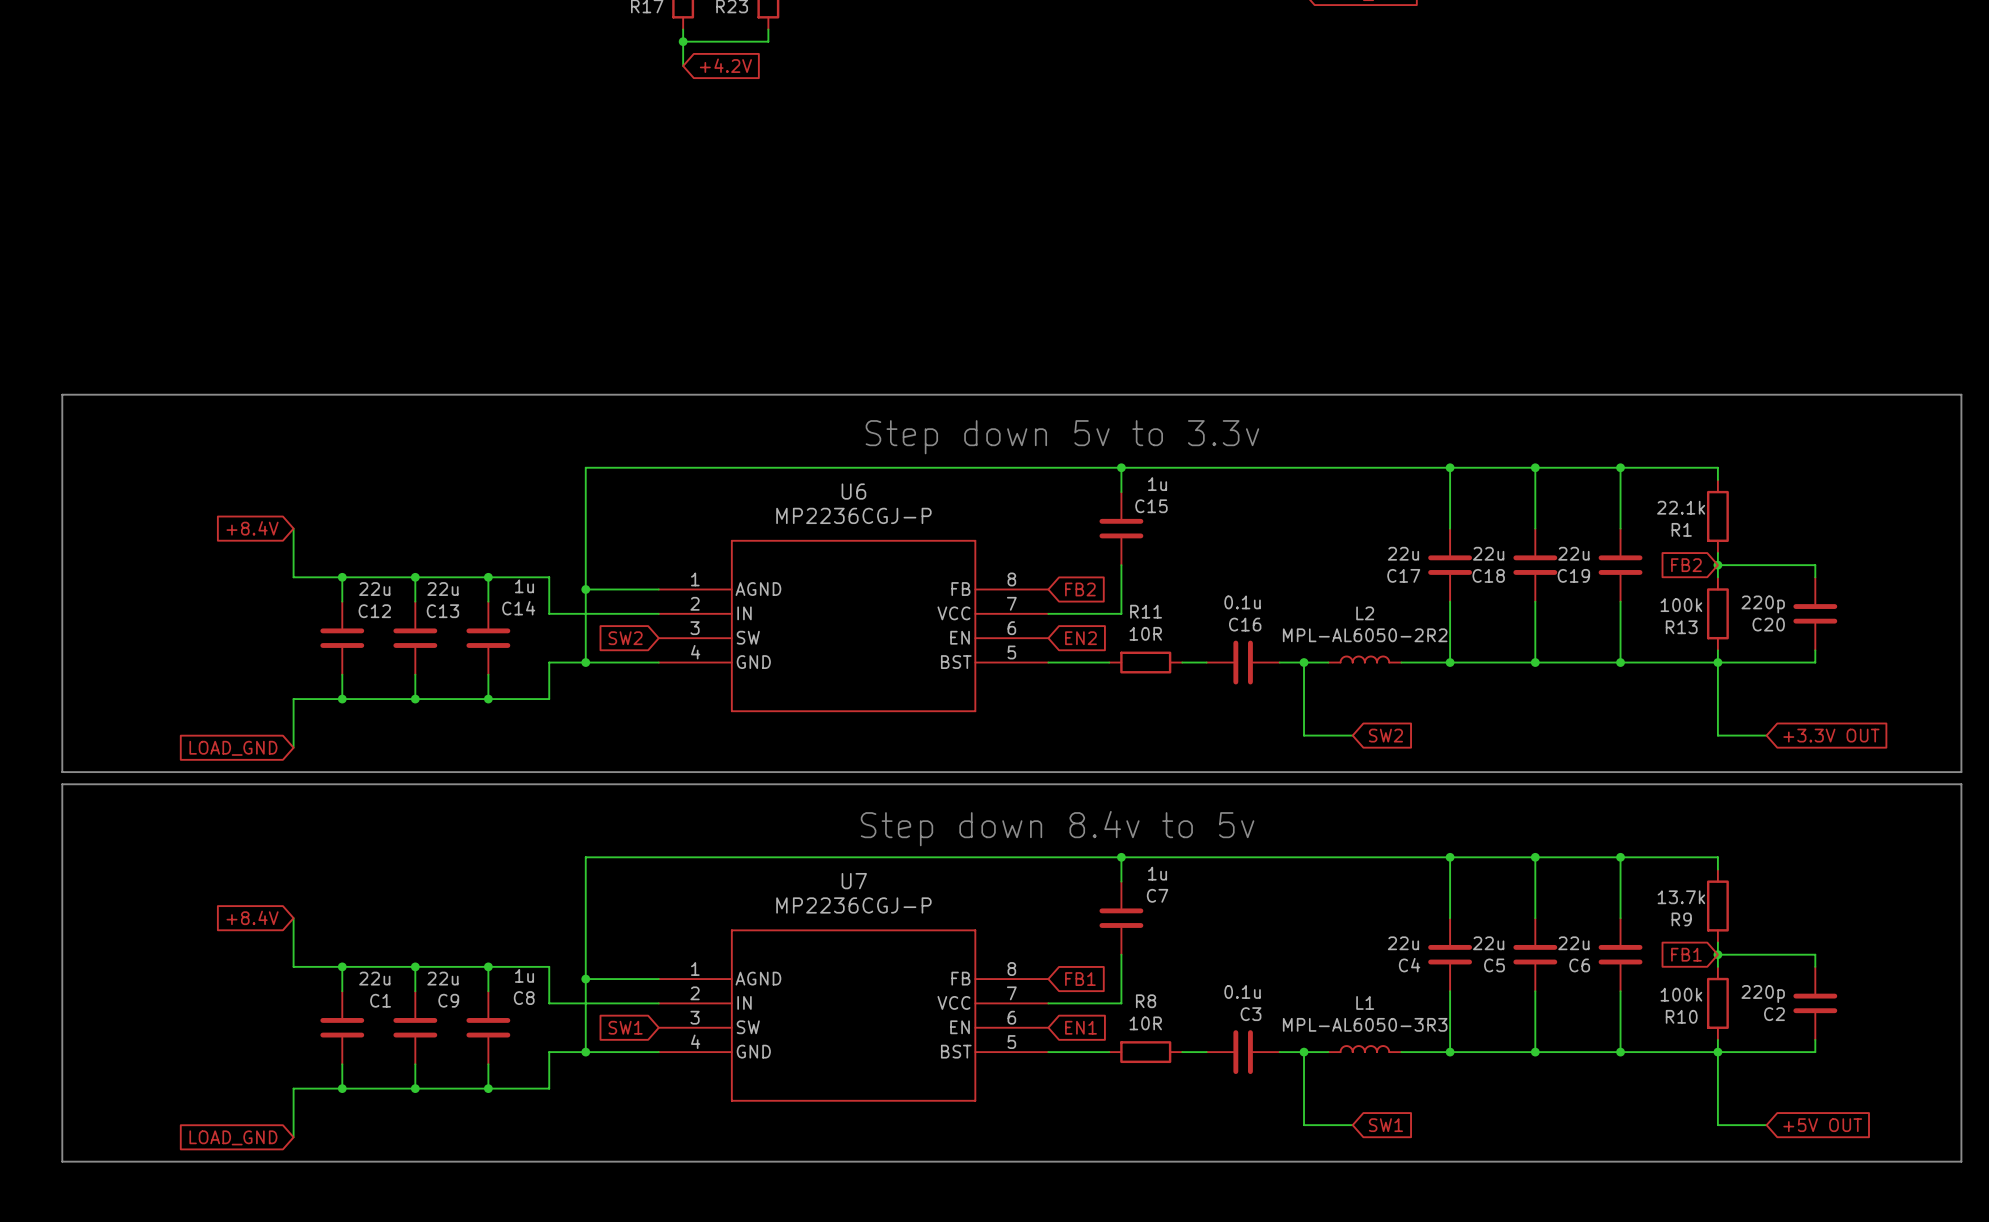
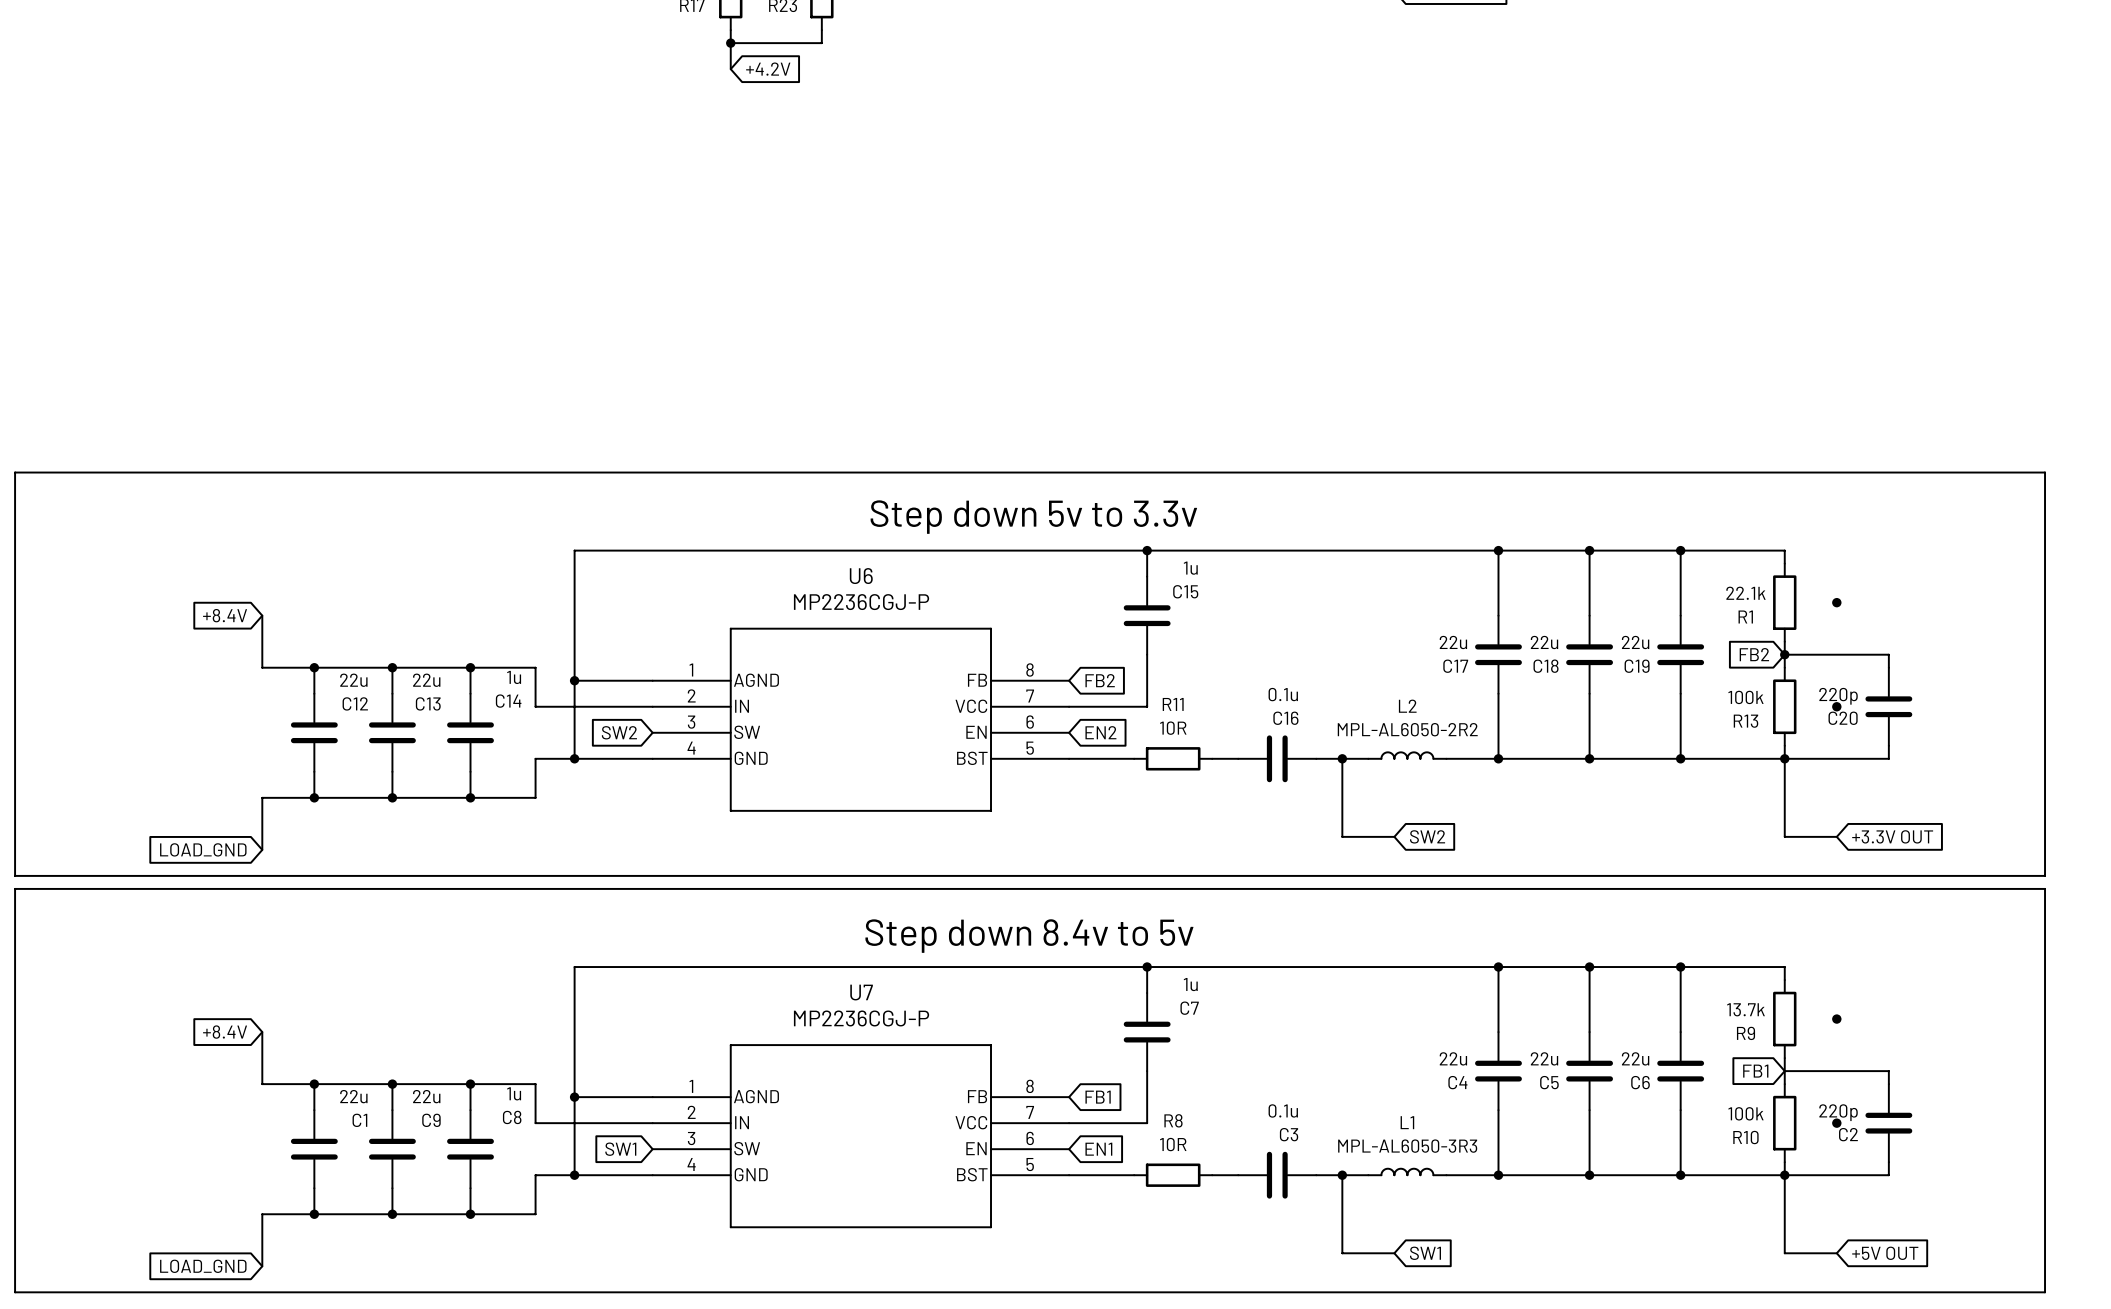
line: (62, 394) (1961, 394) (1961, 772) (62, 772) (62, 394) -> (15, 472) (2045, 472) (2045, 875) (15, 875) (15, 472)
text position: Step down 5v to 3.3v (1062, 437) -> Step down 5v to 3.3v (1033, 517)
wire: (1121, 467) (1121, 492) -> (1147, 550) (1147, 576)
junction: (1121, 467) -> none
wire: (1450, 467) (1450, 528) -> (1498, 550) (1498, 615)
junction: (1450, 467) -> none
wire: (1535, 467) (1535, 528) -> (1589, 550) (1589, 615)
junction: (1535, 467) -> none
wire: (1620, 467) (1620, 528) -> (1680, 550) (1680, 615)
junction: (1620, 467) -> none
wire: (1717, 479) (1717, 467) (585, 467) (585, 662) -> (1784, 563) (1784, 550) (574, 550) (574, 758)
junction: none -> (1147, 550)
junction: none -> (1498, 550)
junction: none -> (1589, 550)
junction: none -> (1680, 550)
R1 position: (1717, 516) -> (1784, 602)
global label position: +8.4V (252, 528) -> +8.4V (225, 615)
wire: (293, 528) (293, 577) (549, 577) (549, 613) (658, 613) -> none
C15 position: (1121, 528) -> (1147, 615)
wire: (1717, 552) (1717, 577) -> (1784, 641) (1784, 667)
wire: (1121, 565) (1121, 613) (1048, 613) -> none
C17 position: (1450, 565) -> (1498, 654)
C18 position: (1535, 565) -> (1589, 654)
C19 position: (1620, 565) -> (1680, 654)
global label position: FB2 (1686, 565) -> FB2 (1754, 654)
wire: (1717, 565) (1815, 565) (1815, 577) -> (1784, 654) (1888, 654) (1888, 667)
wire: (342, 577) (342, 601) -> (314, 667) (314, 693)
junction: (342, 577) -> none
wire: (415, 577) (415, 601) -> (392, 667) (392, 693)
junction: (415, 577) -> none
wire: (488, 577) (488, 601) -> (470, 667) (470, 693)
junction: (488, 577) -> none
wire: (585, 589) (658, 589) -> (574, 680) (652, 680)
junction: (585, 589) -> none
global label position: FB2 (1080, 589) -> FB2 (1100, 680)
wire: (1450, 601) (1450, 662) -> (1498, 693) (1498, 758)
wire: (1535, 601) (1535, 662) -> (1589, 693) (1589, 758)
wire: (1620, 601) (1620, 662) -> (1680, 693) (1680, 758)
junction: none -> (1784, 654)
R13 position: (1717, 613) -> (1784, 706)
C20 position: (1815, 613) -> (1888, 706)
junction: none -> (314, 667)
junction: none -> (392, 667)
junction: none -> (470, 667)
U6 position: (853, 626) -> (860, 719)
C12 position: (342, 638) -> (314, 732)
C13 position: (415, 638) -> (392, 732)
C14 position: (488, 638) -> (470, 732)
junction: none -> (574, 680)
global label position: SW2 (625, 638) -> SW2 (619, 732)
global label position: EN2 (1080, 638) -> EN2 (1100, 732)
wire: (1717, 650) (1717, 735) (1766, 735) -> (1784, 745) (1784, 836) (1836, 836)
wire: (1815, 650) (1815, 662) (1401, 662) -> (1888, 745) (1888, 758) (1446, 758)
L2 position: (1364, 659) -> (1407, 755)
wire: (549, 662) (549, 699) (293, 699) (293, 723) -> (587, 706) (535, 706) (535, 667) (262, 667) (262, 615)
junction: (585, 662) -> none
wire: (1072, 662) (1109, 662) -> (1147, 706) (1147, 654)
R11 position: (1145, 662) -> (1173, 758)
wire: (1182, 662) (1206, 662) -> (1212, 758) (1238, 758)
C16 position: (1243, 662) -> (1277, 758)
wire: (1279, 662) (1328, 662) -> (1316, 758) (1368, 758)
wire: (1304, 662) (1304, 735) (1352, 735) -> (1342, 758) (1342, 836) (1394, 836)
junction: (1304, 662) -> none
junction: (1450, 662) -> none
junction: (1535, 662) -> none
junction: (1620, 662) -> none
wire: (342, 674) (342, 699) -> none
wire: (415, 674) (415, 699) -> (392, 771) (392, 797)
wire: (488, 674) (488, 699) -> (470, 771) (470, 797)
junction: (342, 699) -> none
junction: (415, 699) -> none
junction: (488, 699) -> none
junction: none -> (574, 758)
wire: none -> (652, 758) (535, 758) (535, 797) (262, 797) (262, 849)
wire: none -> (1069, 758) (1134, 758)
junction: none -> (1342, 758)
junction: none -> (1498, 758)
junction: none -> (1589, 758)
junction: none -> (1680, 758)
junction: none -> (1784, 758)
global label position: SW2 (1385, 735) -> SW2 (1427, 836)
global label position: +3.3V OUT (1831, 735) -> +3.3V OUT (1892, 836)
junction: none -> (314, 797)
junction: none -> (392, 797)
junction: none -> (470, 797)
global label position: LOAD_GND (233, 748) -> LOAD_GND (203, 849)
line: (62, 784) (62, 1161) (1961, 1161) (1961, 784) (62, 784) -> (15, 888) (15, 1292) (2045, 1292) (2045, 888) (15, 888)
text position: Step down 8.4v to 5v (1057, 828) -> Step down 8.4v to 5v (1029, 936)
wire: (1121, 857) (1121, 881) -> (1147, 967) (1147, 993)
junction: (1121, 857) -> none
wire: (1450, 857) (1450, 918) -> (1498, 967) (1498, 1032)
junction: (1450, 857) -> none
wire: (1535, 857) (1535, 918) -> (1589, 967) (1589, 1032)
junction: (1535, 857) -> none
wire: (1620, 857) (1620, 918) -> (1680, 967) (1680, 1032)
junction: (1620, 857) -> none
wire: (1717, 869) (1717, 857) (585, 857) (585, 1052) -> (1784, 980) (1784, 967) (574, 967) (574, 1175)
junction: none -> (1147, 967)
junction: none -> (1498, 967)
junction: none -> (1589, 967)
junction: none -> (1680, 967)
R9 position: (1717, 906) -> (1784, 1019)
global label position: +8.4V (252, 917) -> +8.4V (225, 1032)
wire: (293, 918) (293, 966) (549, 966) (549, 1003) (658, 1003) -> none
C7 position: (1121, 918) -> (1147, 1032)
wire: (1717, 942) (1717, 966) -> (1784, 1058) (1784, 1084)
wire: (1121, 954) (1121, 1003) (1048, 1003) -> none
C4 position: (1450, 954) -> (1498, 1071)
C5 position: (1535, 954) -> (1589, 1071)
C6 position: (1620, 954) -> (1680, 1071)
global label position: FB1 (1686, 954) -> FB1 (1755, 1071)
wire: (1717, 954) (1815, 954) (1815, 966) -> (1784, 1071) (1888, 1071) (1888, 1084)
wire: (342, 966) (342, 991) -> (314, 1084) (314, 1110)
junction: (342, 966) -> none
wire: (415, 966) (415, 991) -> (392, 1084) (392, 1110)
junction: (415, 966) -> none
wire: (488, 966) (488, 991) -> (470, 1084) (470, 1110)
junction: (488, 966) -> none
wire: (585, 979) (658, 979) -> (574, 1097) (652, 1097)
junction: (585, 979) -> none
global label position: FB1 (1080, 979) -> FB1 (1098, 1097)
wire: (1450, 991) (1450, 1052) -> (1498, 1110) (1498, 1175)
wire: (1535, 991) (1535, 1052) -> (1589, 1110) (1589, 1175)
wire: (1620, 991) (1620, 1052) -> (1680, 1110) (1680, 1175)
R10 position: (1717, 1003) -> (1784, 1123)
C2 position: (1815, 1003) -> (1888, 1123)
junction: none -> (314, 1084)
junction: none -> (392, 1084)
junction: none -> (470, 1084)
U7 position: (853, 1015) -> (860, 1136)
C1 position: (342, 1027) -> (314, 1149)
C9 position: (415, 1027) -> (392, 1149)
C8 position: (488, 1027) -> (470, 1149)
junction: none -> (574, 1097)
global label position: SW1 (625, 1027) -> SW1 (620, 1149)
global label position: EN1 (1080, 1027) -> EN1 (1098, 1149)
wire: (1717, 1039) (1717, 1125) (1766, 1125) -> (1784, 1162) (1784, 1253) (1836, 1253)
wire: (1815, 1039) (1815, 1052) (1401, 1052) -> (1888, 1162) (1888, 1175) (1446, 1175)
L1 position: (1364, 1049) -> (1407, 1171)
wire: (549, 1052) (549, 1088) (293, 1088) (293, 1112) -> (587, 1123) (535, 1123) (535, 1084) (262, 1084) (262, 1032)
junction: (585, 1052) -> none
wire: (1072, 1052) (1109, 1052) -> (1147, 1123) (1147, 1071)
R8 position: (1145, 1052) -> (1173, 1175)
wire: (1182, 1052) (1206, 1052) -> (1212, 1175) (1238, 1175)
C3 position: (1243, 1052) -> (1277, 1175)
wire: (1279, 1052) (1328, 1052) -> (1316, 1175) (1368, 1175)
wire: (1304, 1052) (1304, 1125) (1352, 1125) -> (1342, 1175) (1342, 1253) (1394, 1253)
junction: (1304, 1052) -> none
junction: (1450, 1052) -> none
junction: (1535, 1052) -> none
junction: (1620, 1052) -> none
wire: (342, 1064) (342, 1088) -> none
wire: (415, 1064) (415, 1088) -> (392, 1188) (392, 1214)
wire: (488, 1064) (488, 1088) -> (470, 1188) (470, 1214)
junction: (342, 1088) -> none
junction: (415, 1088) -> none
junction: (488, 1088) -> none
junction: none -> (574, 1175)
wire: none -> (652, 1175) (535, 1175) (535, 1214) (262, 1214) (262, 1266)
wire: none -> (1069, 1175) (1134, 1175)
junction: none -> (1342, 1175)
junction: none -> (1498, 1175)
junction: none -> (1589, 1175)
junction: none -> (1680, 1175)
junction: none -> (1784, 1175)
global label position: SW1 (1385, 1125) -> SW1 (1425, 1253)
global label position: +5V OUT (1822, 1125) -> +5V OUT (1885, 1253)
global label position: LOAD_GND (233, 1137) -> LOAD_GND (203, 1266)
junction: none -> (314, 1214)
junction: none -> (392, 1214)
junction: none -> (470, 1214)

